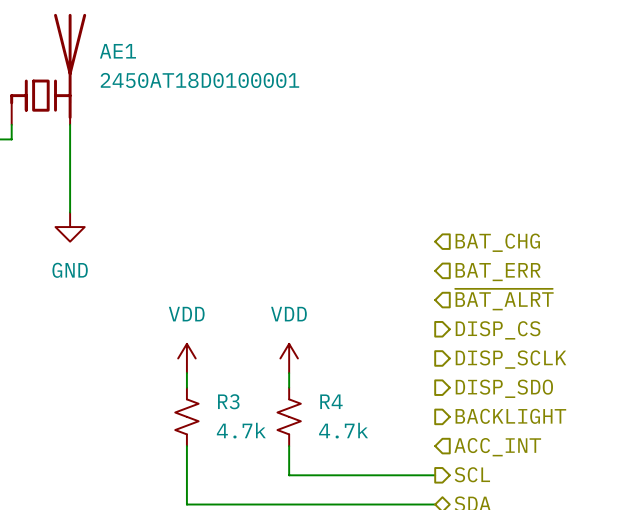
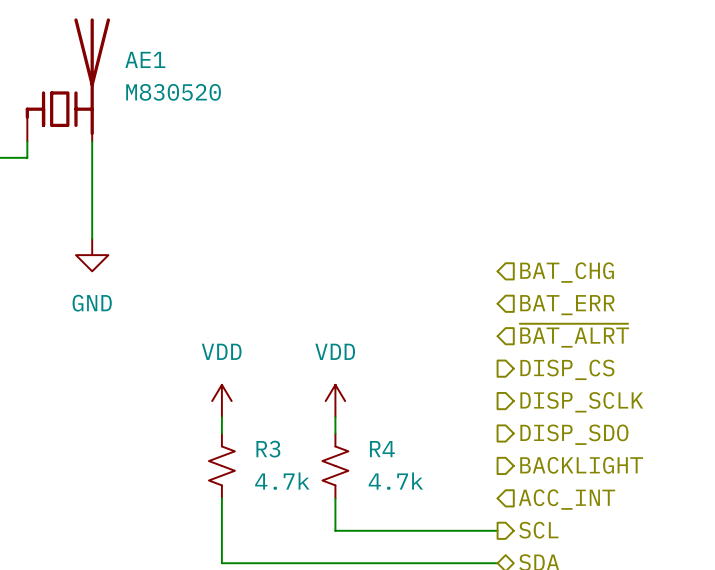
AE1 value: 2450AT18D0100001 (199, 80) -> M830520 (173, 92)

